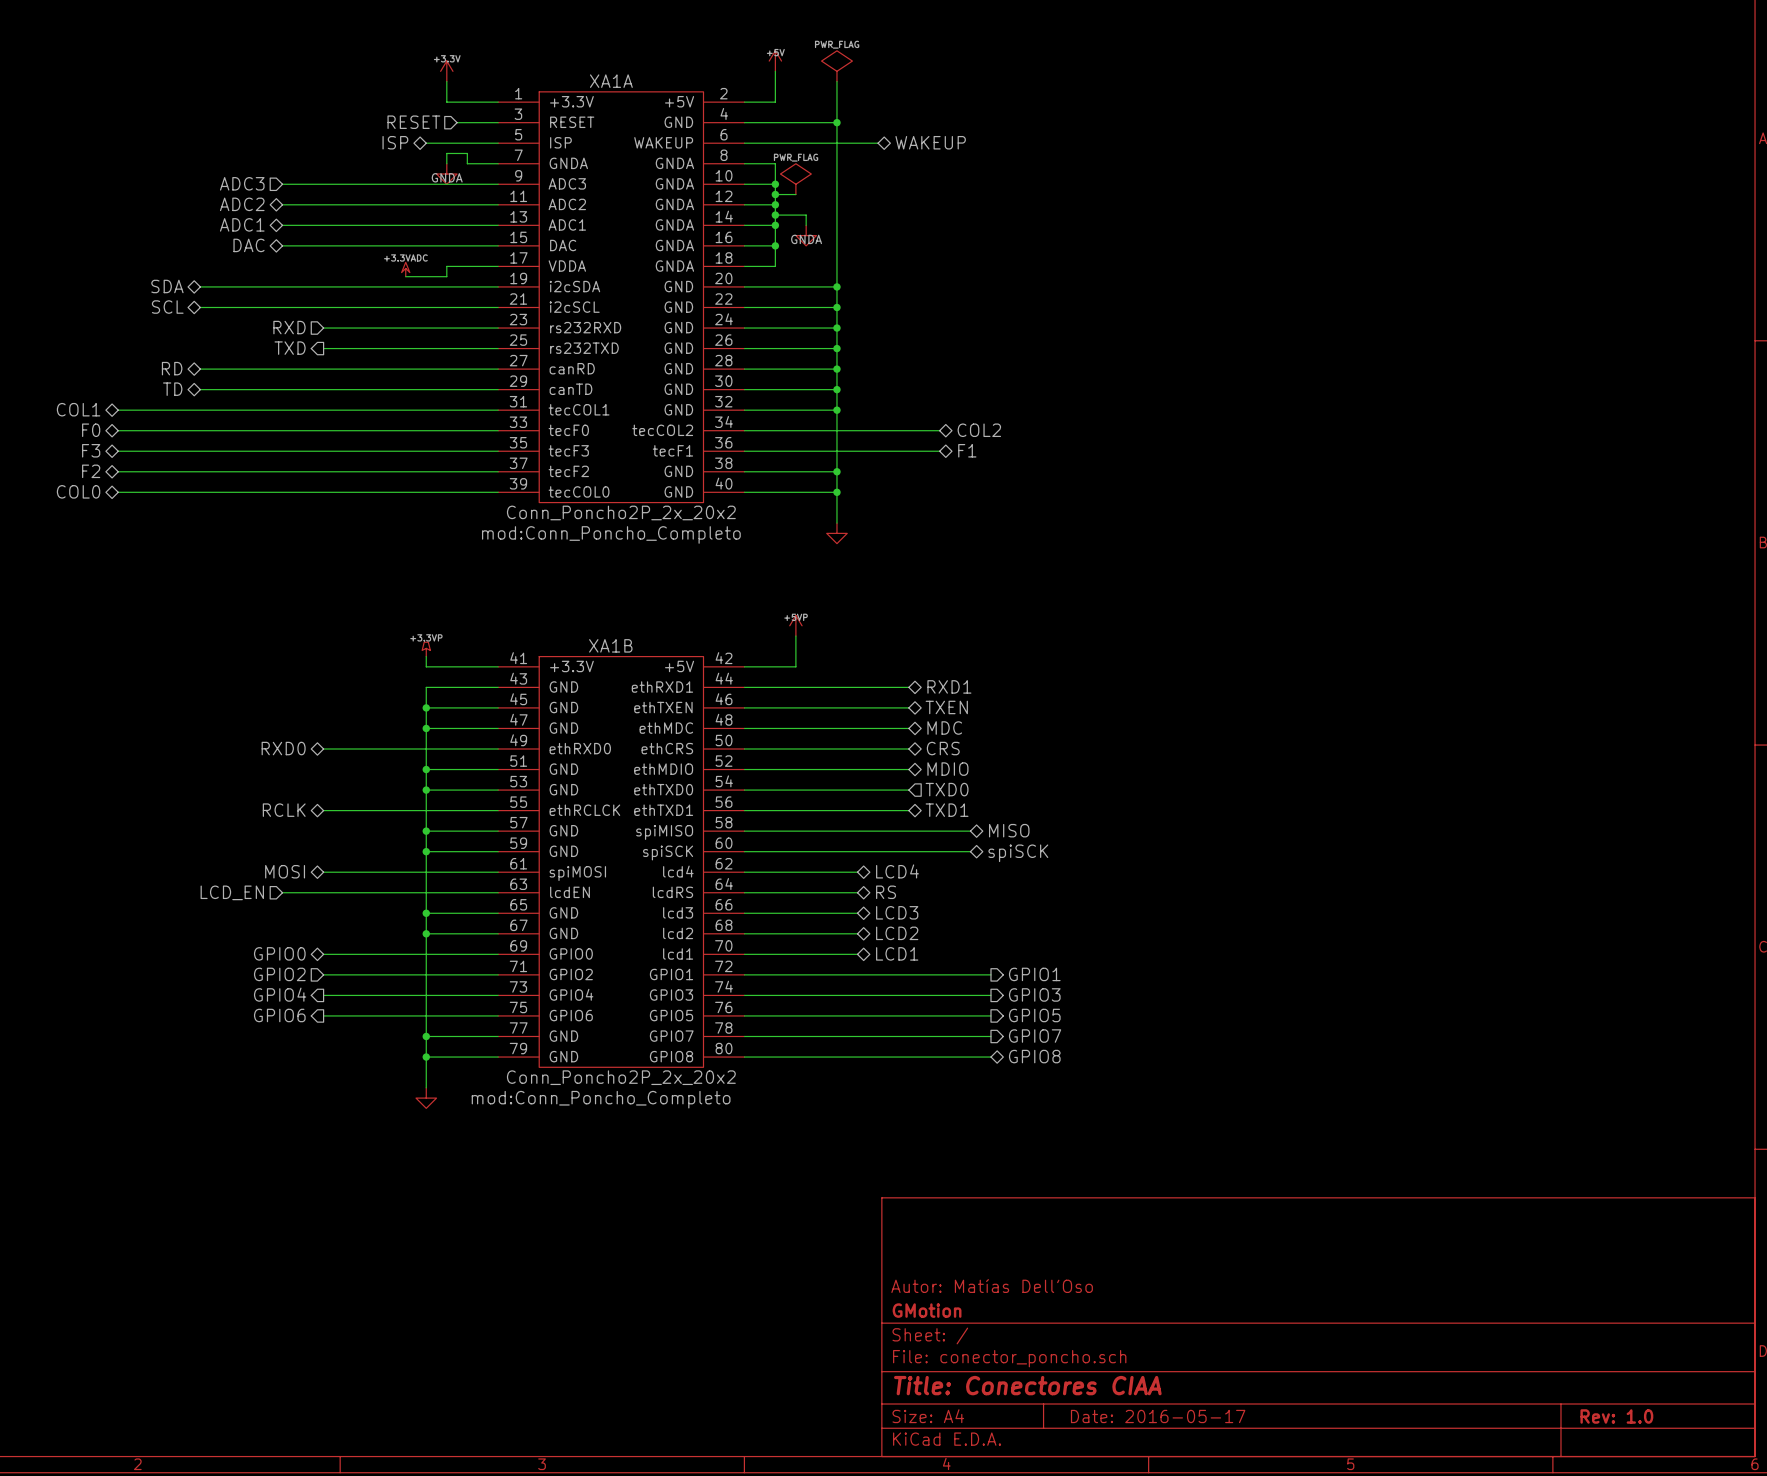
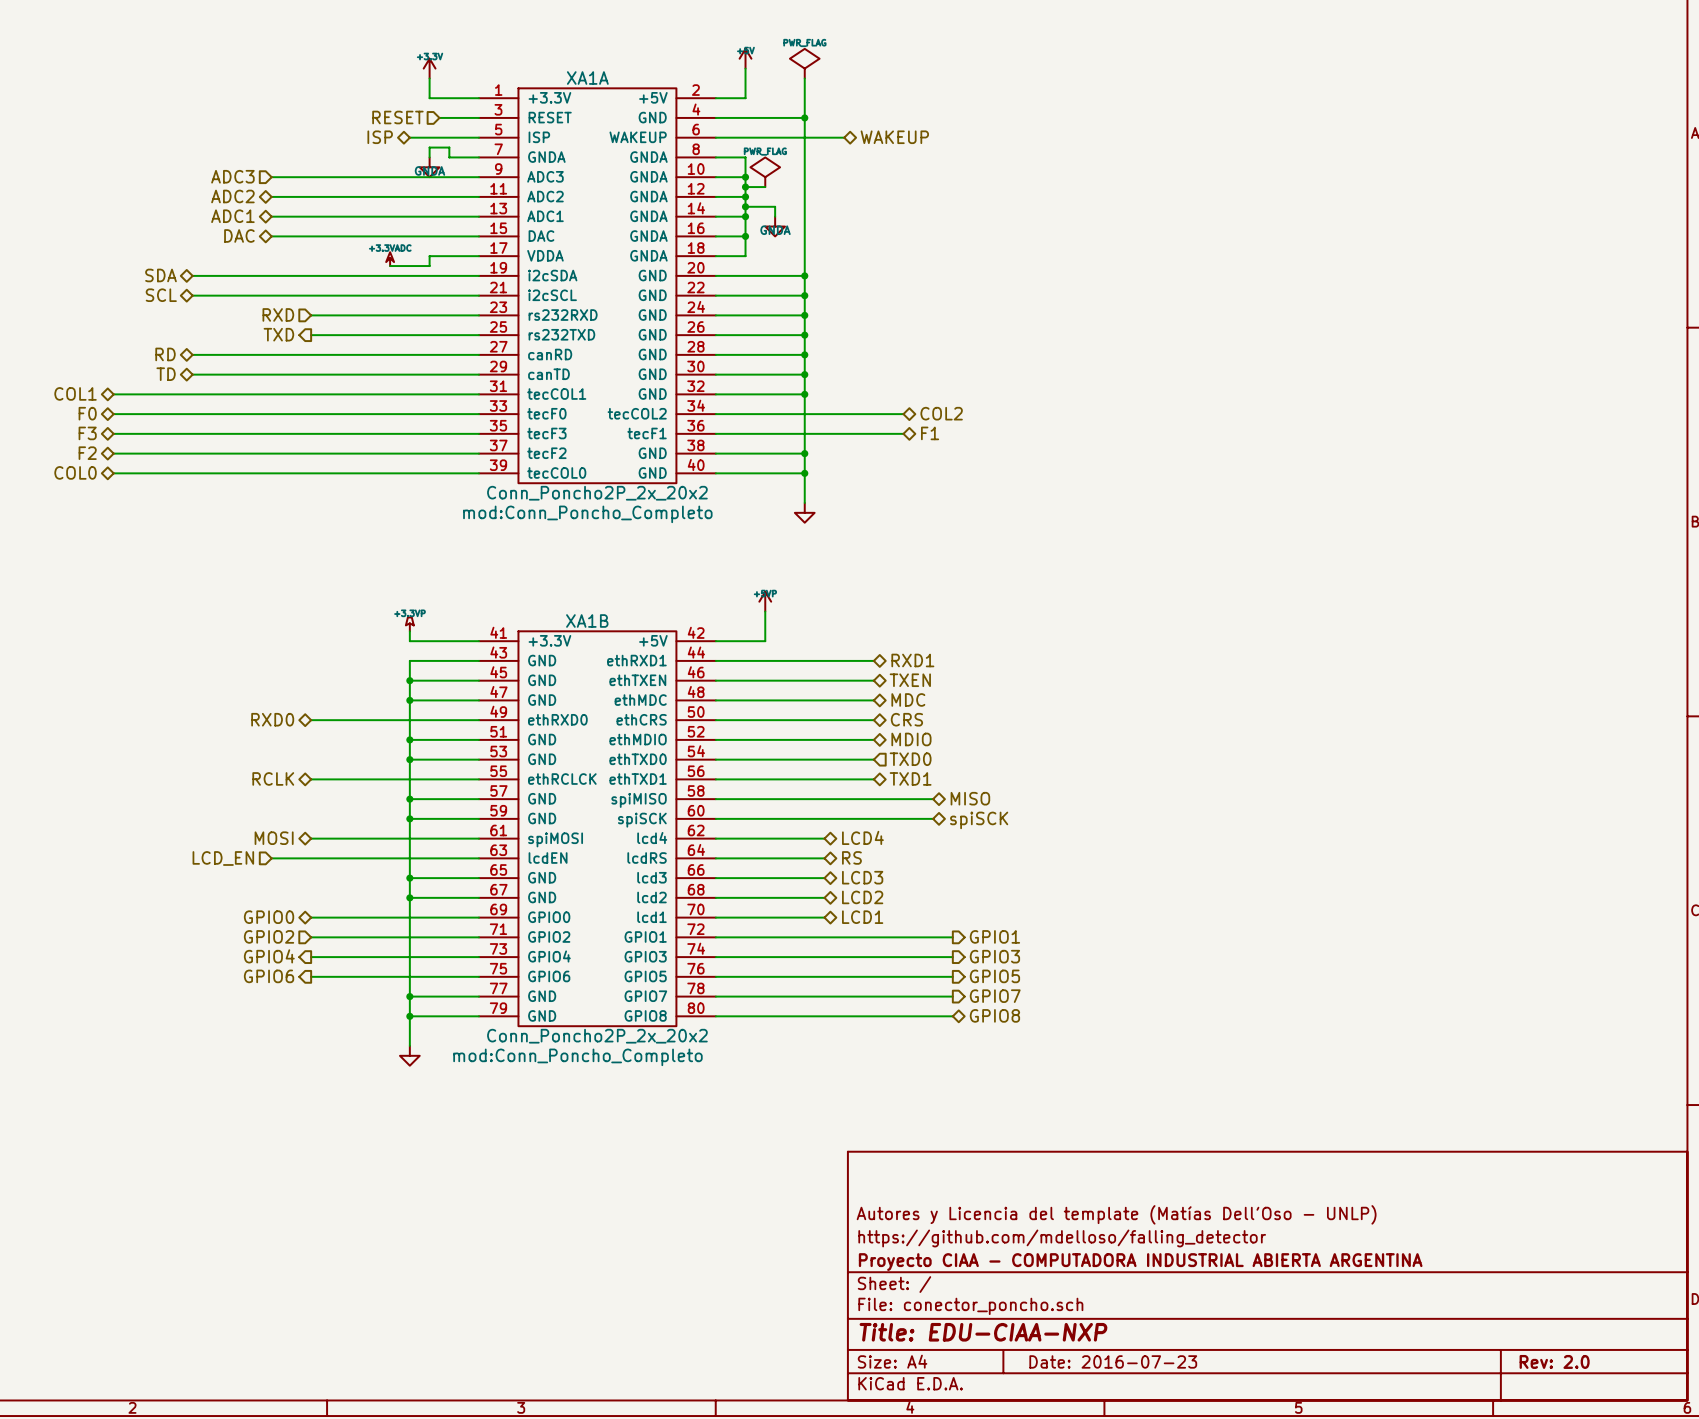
title block: none -> Autores y Licencia del template (Matías Dell'Oso - UNLP) (1116, 1214)
title block: Autor: Matías Dell'Oso (992, 1286) -> https://github.com/mdelloso/falling_detector (1062, 1238)
title block: GMotion (927, 1310) -> Proyecto CIAA - COMPUTADORA INDUSTRIAL ABIERTA ARGENTINA (1140, 1262)
title block: Title: Conectores CIAA (1027, 1385) -> Title: EDU-CIAA-NXP (983, 1332)
title block: Date: 2016-05-17 (1158, 1416) -> Date: 2016-07-23 (1113, 1361)
title block: Rev: 1.0 (1616, 1416) -> Rev: 2.0 (1554, 1361)

